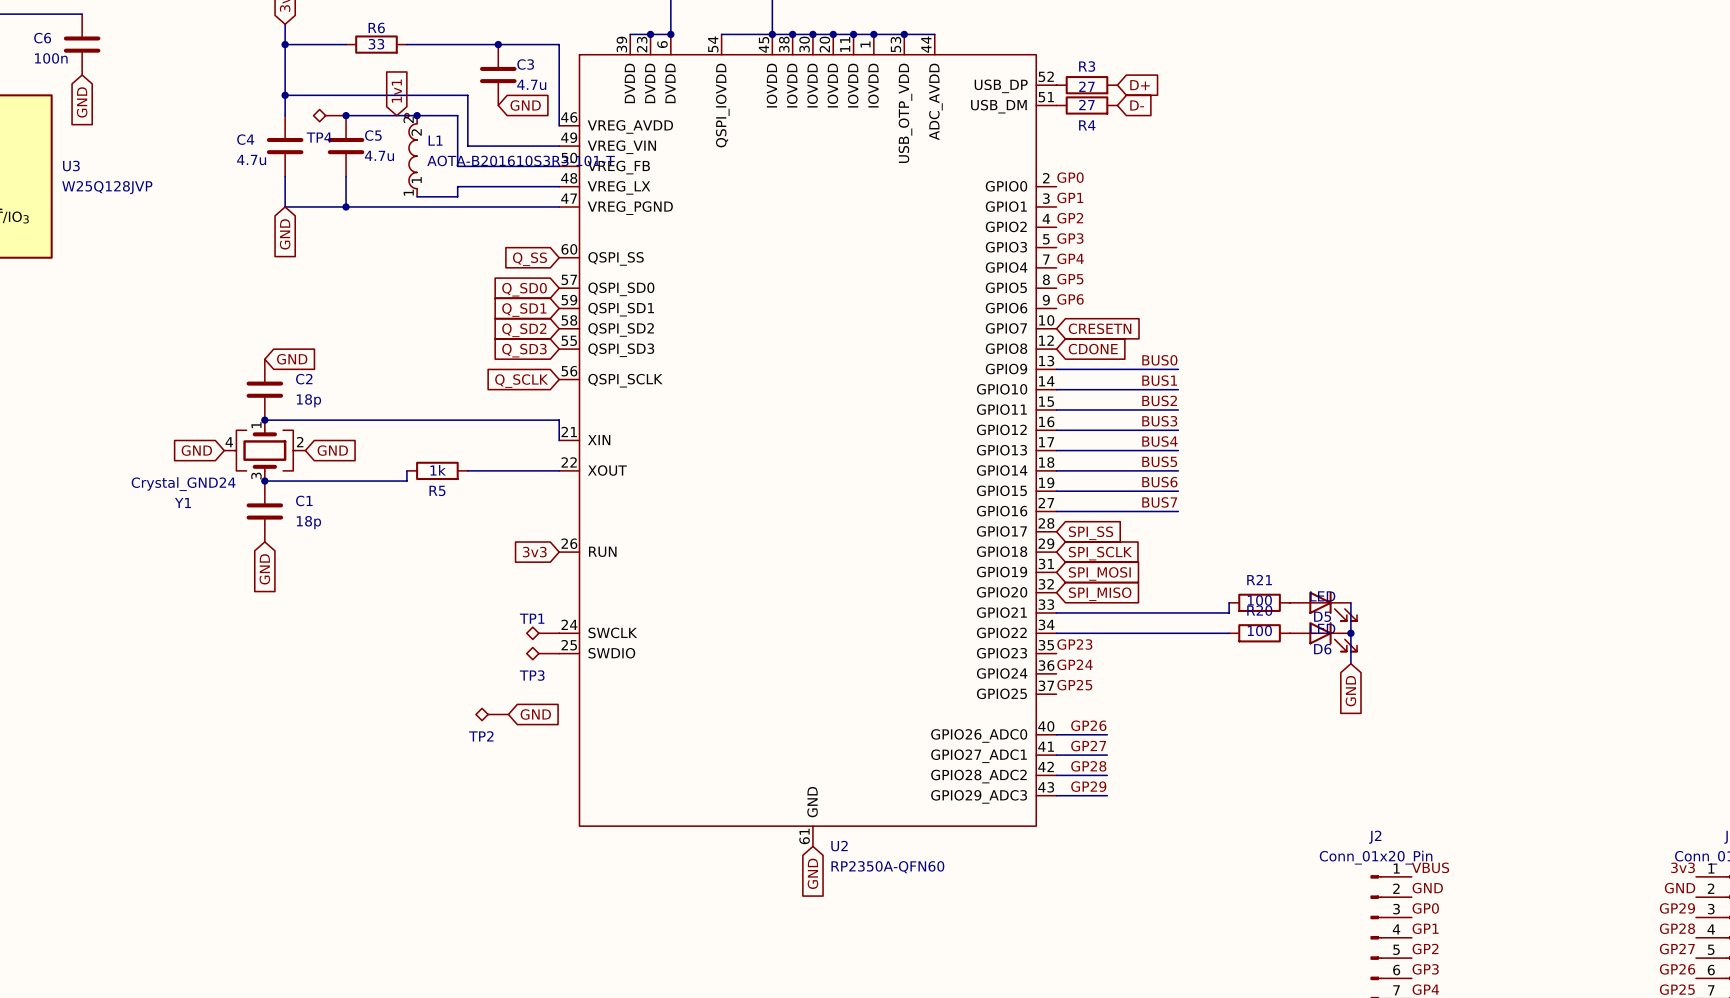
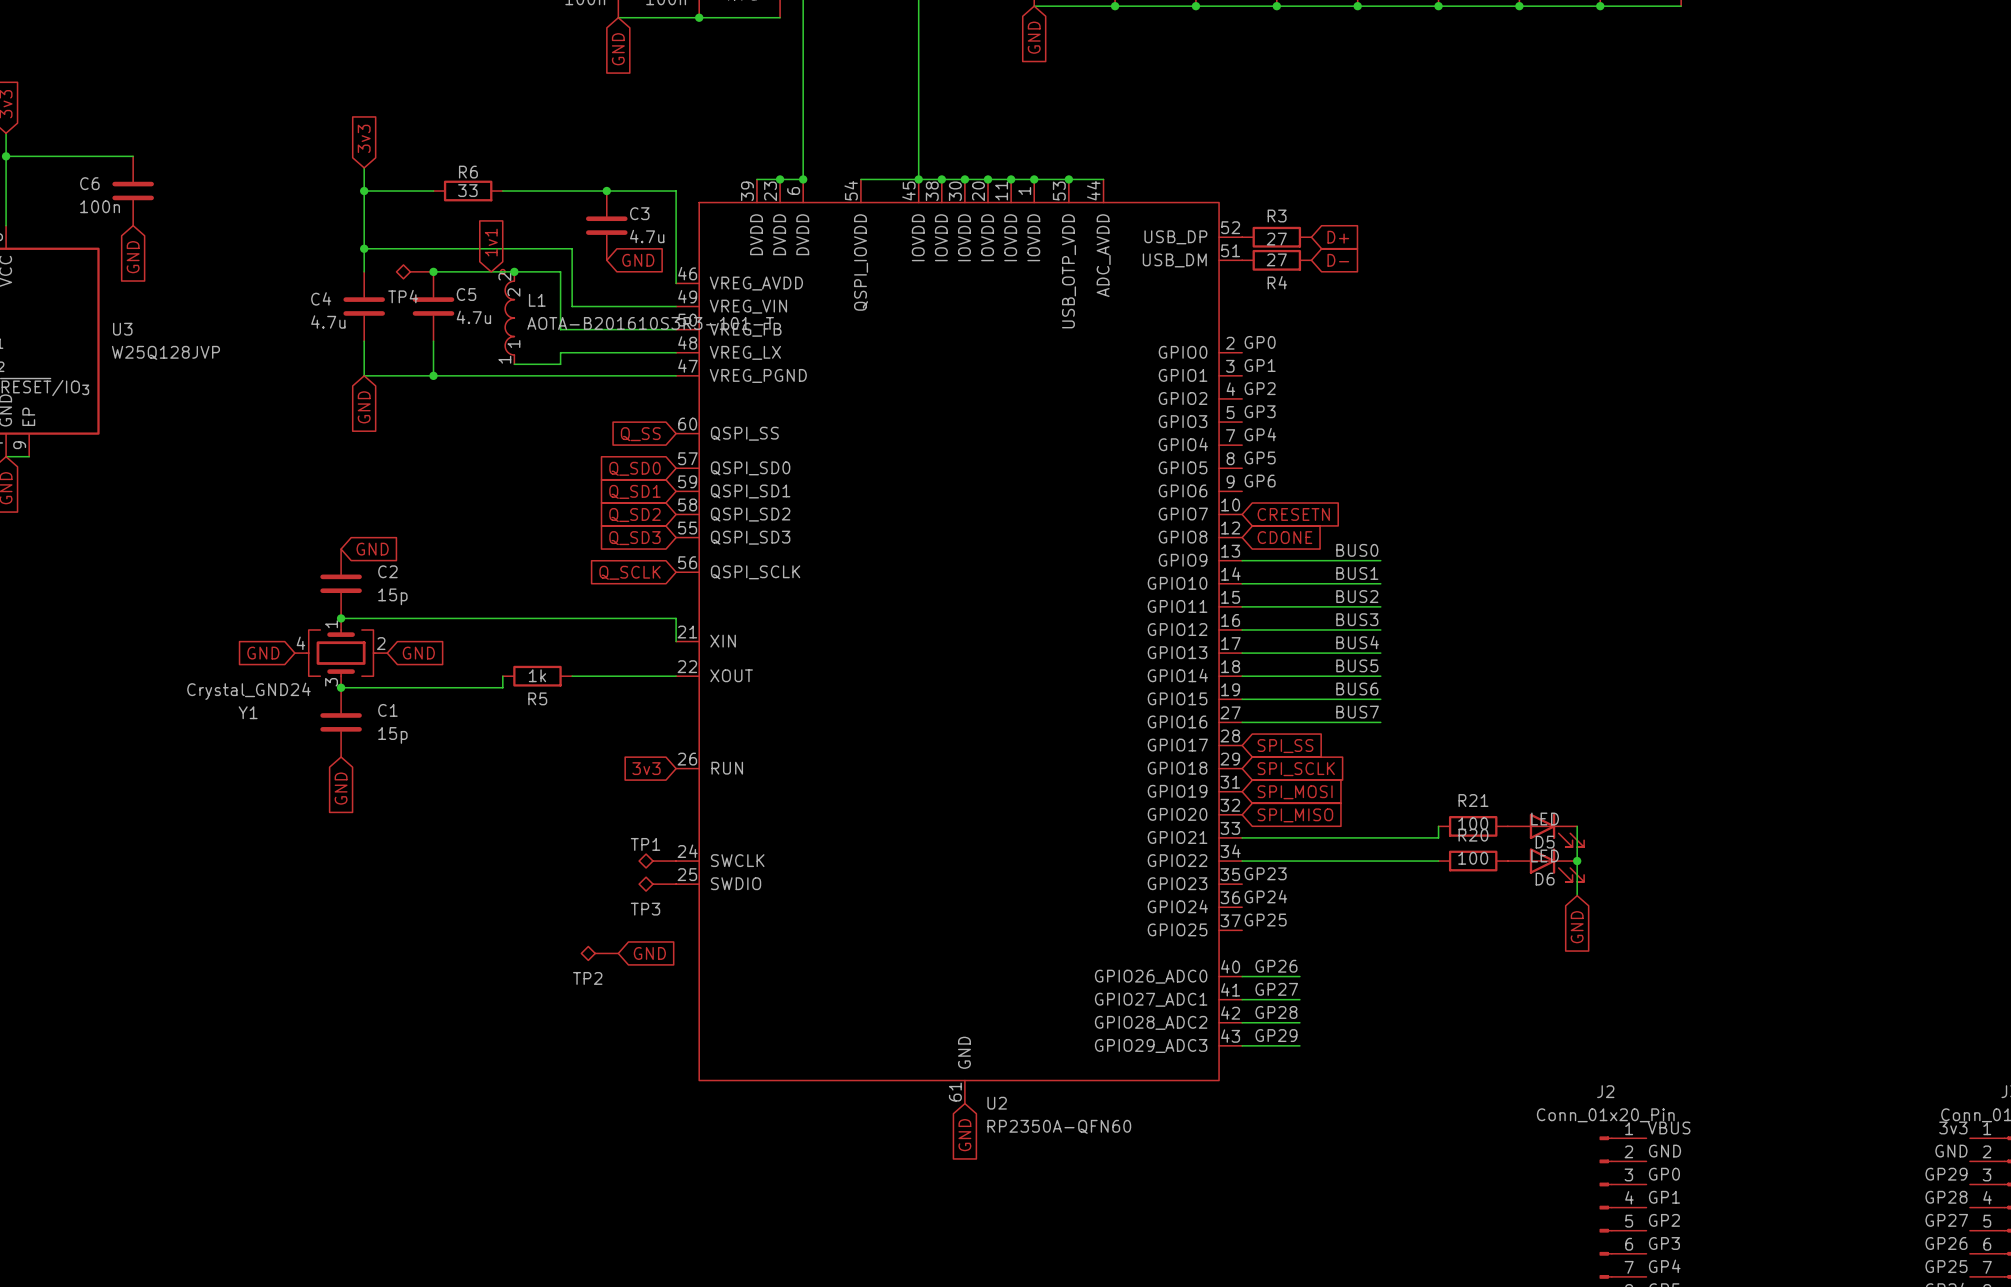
C2 value: 18p (308, 400) -> 15p (392, 596)
C1 value: 18p (308, 522) -> 15p (392, 735)

